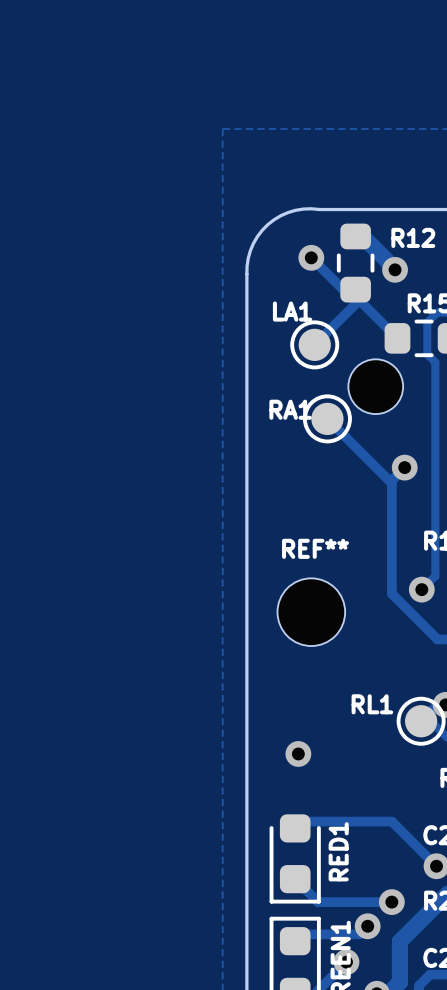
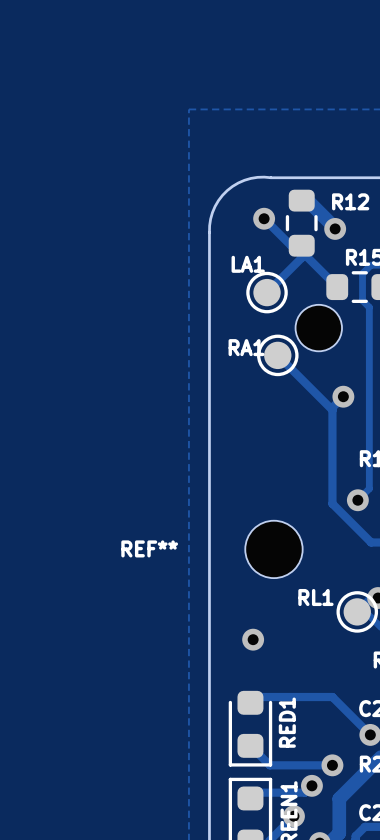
REF** name position: REF** (315, 548) -> REF** (149, 548)
REF** position: (311, 612) -> (273, 549)

